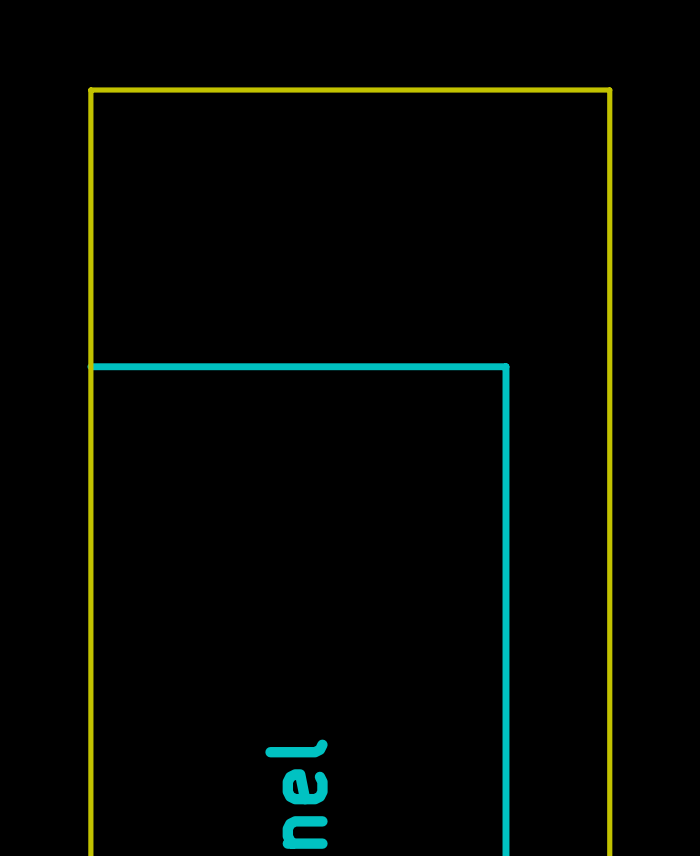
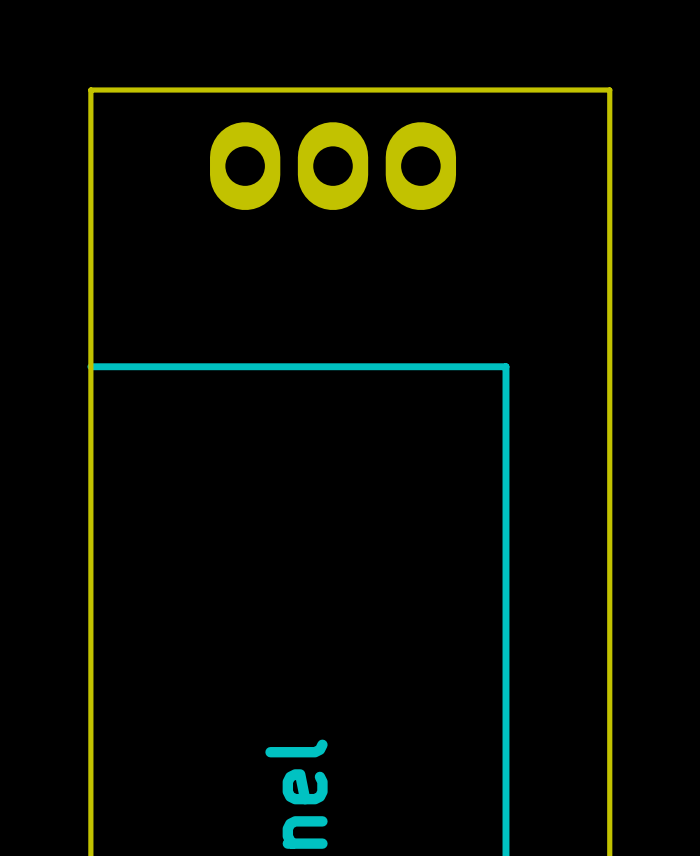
part: none -> (333, 166)

